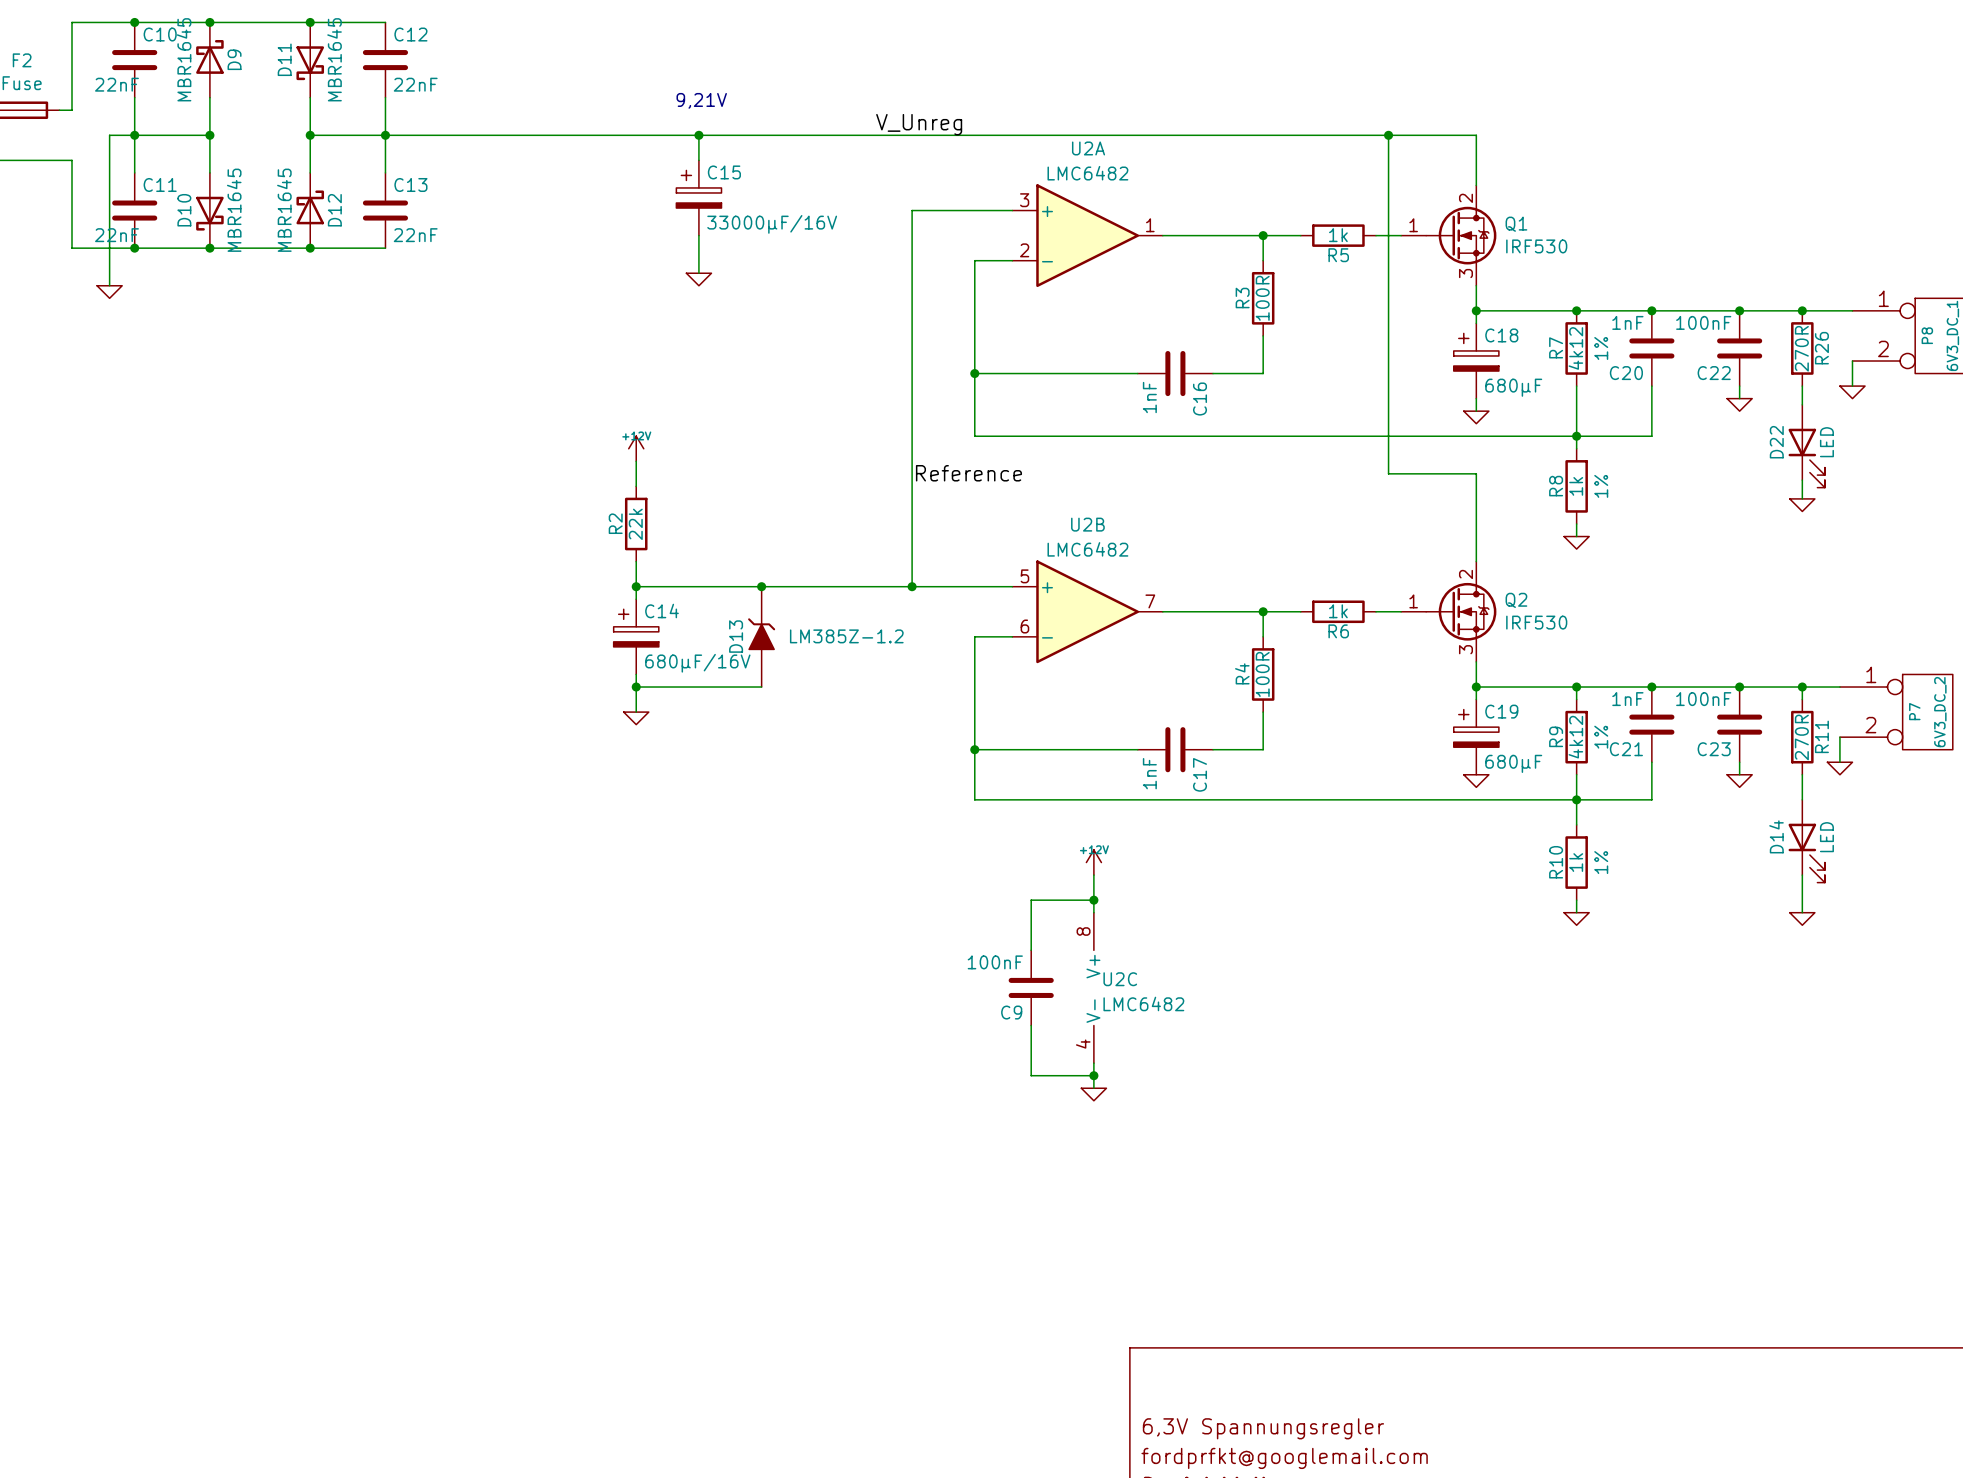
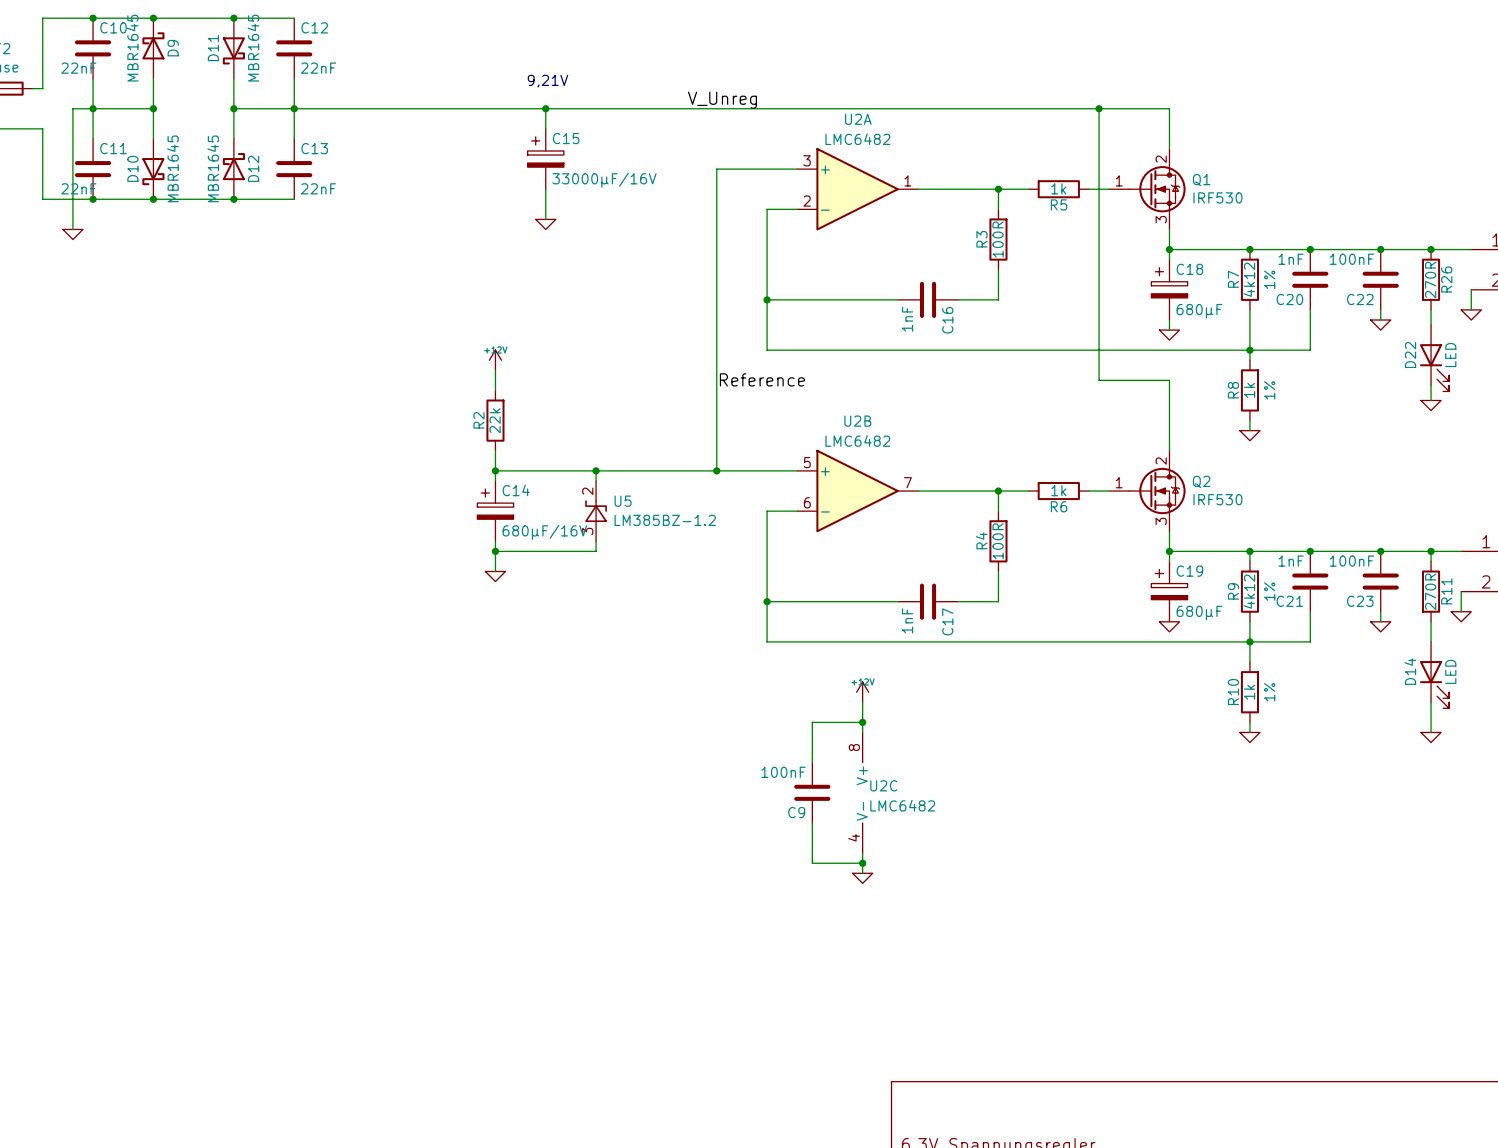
D13: LM385Z-1.2 (761, 636) -> none
U5: none -> LM385BZ-1.2 (596, 511)

